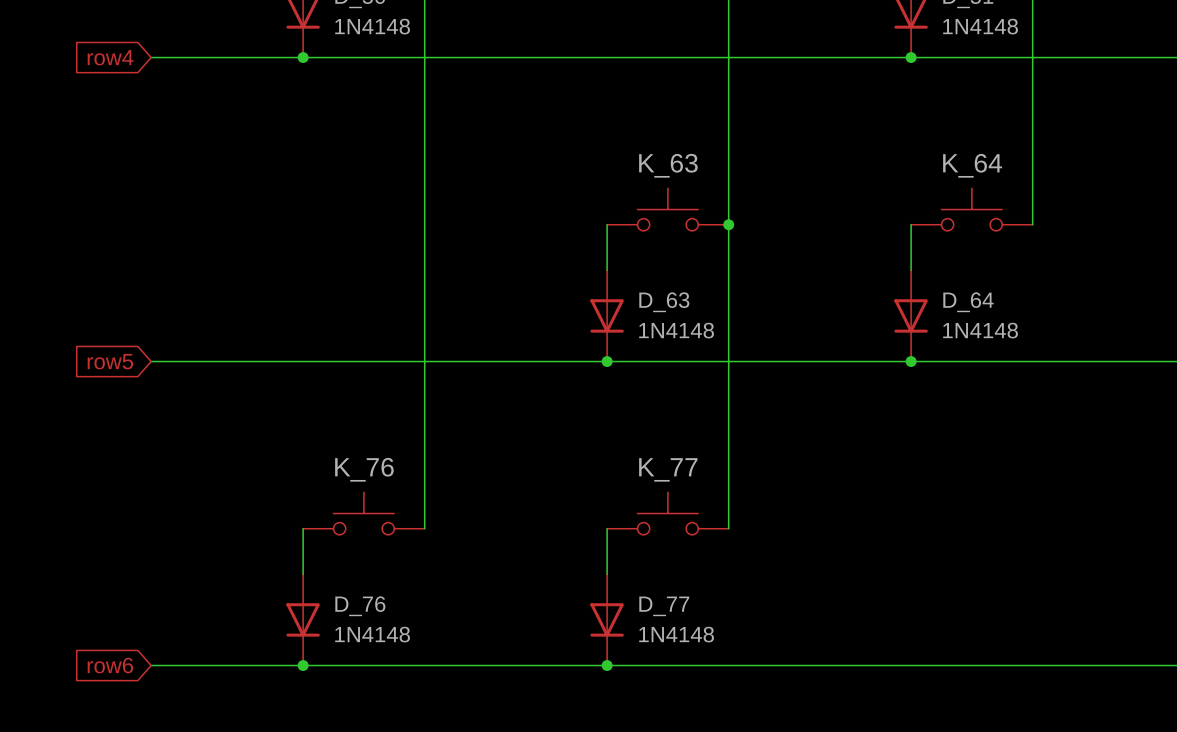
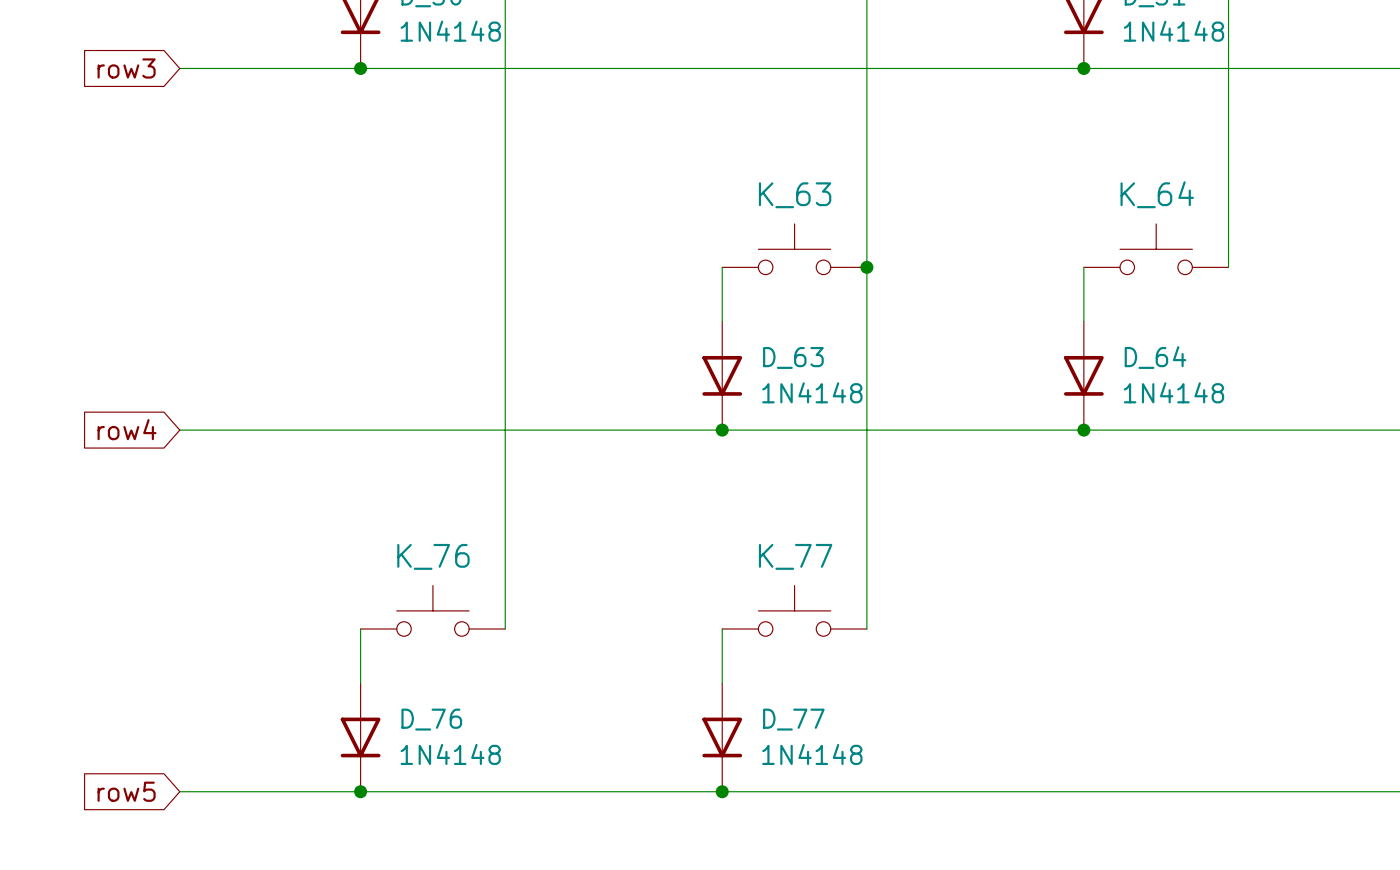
global label: row4 (110, 57) -> row3 (126, 68)
global label: row5 (110, 361) -> row4 (127, 429)
global label: row6 (110, 665) -> row5 (126, 791)

